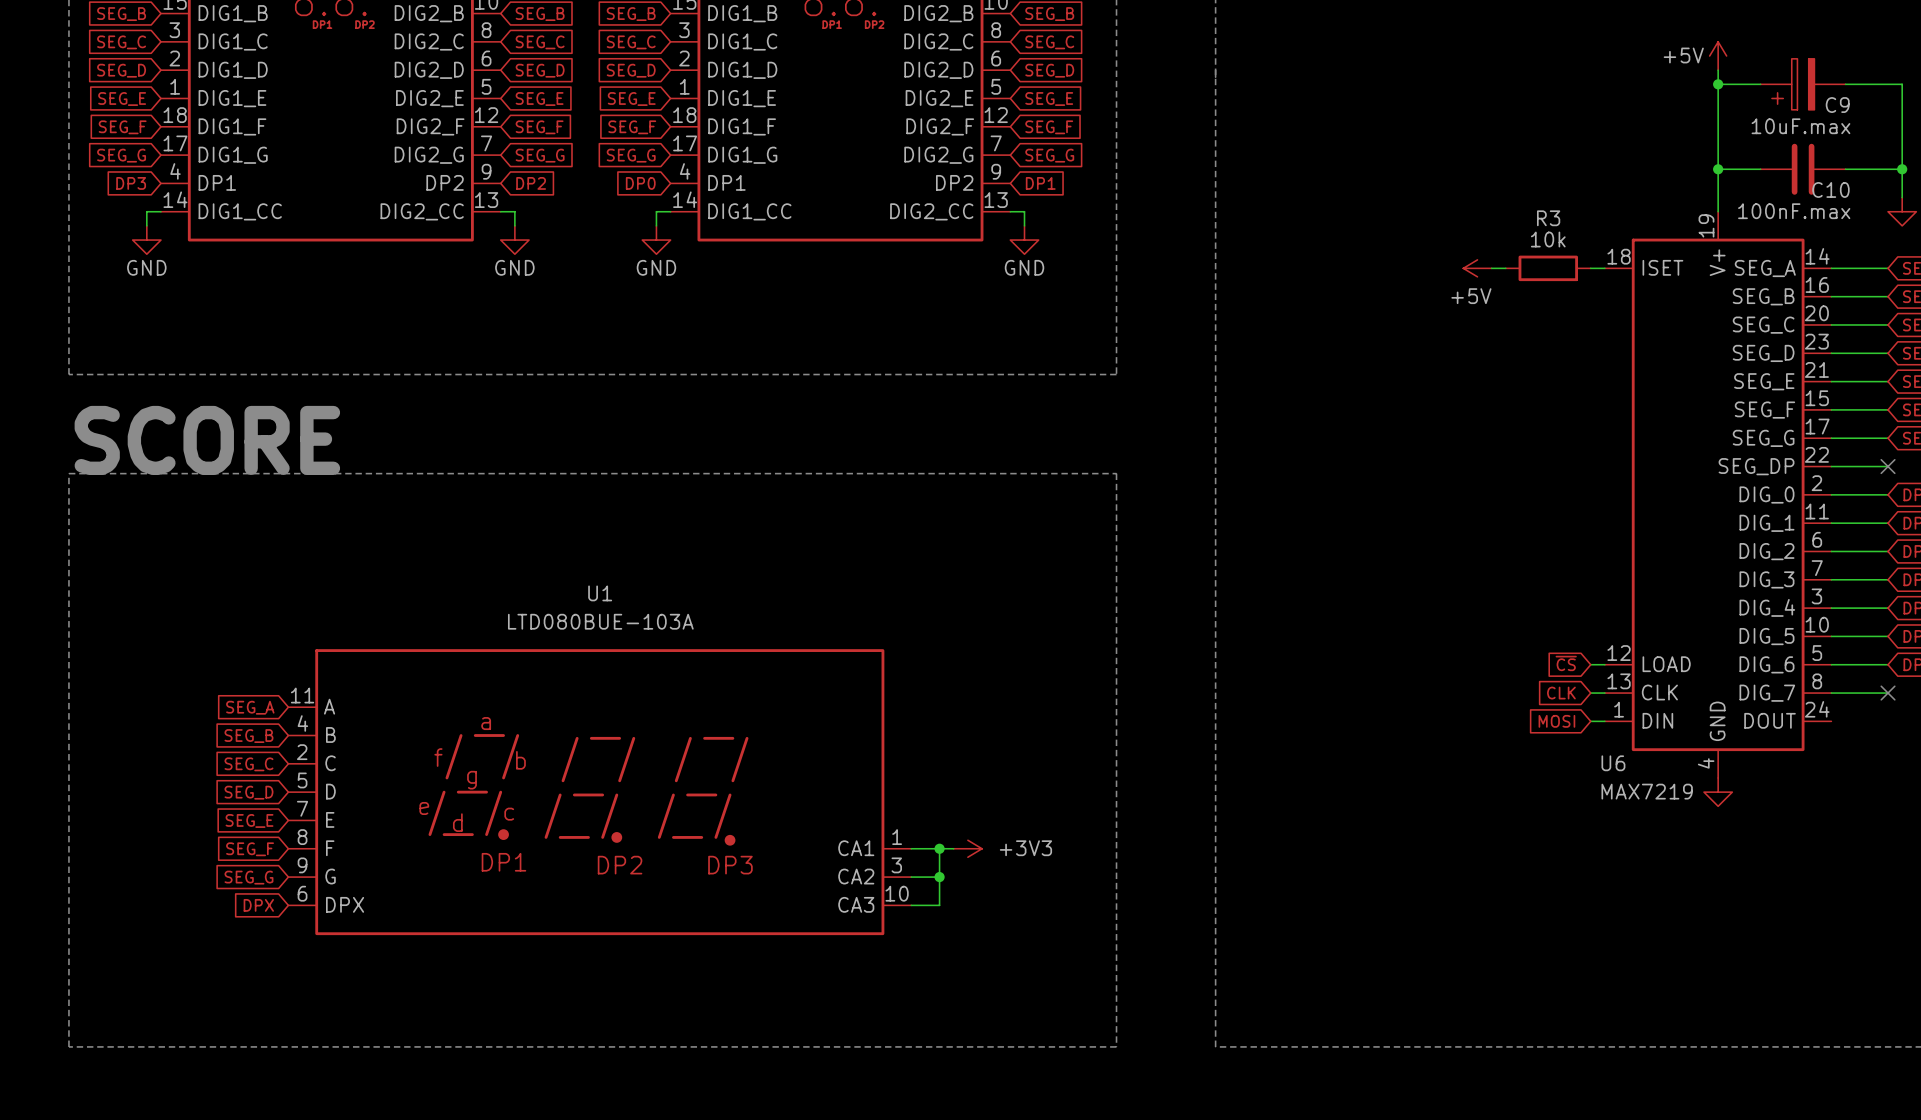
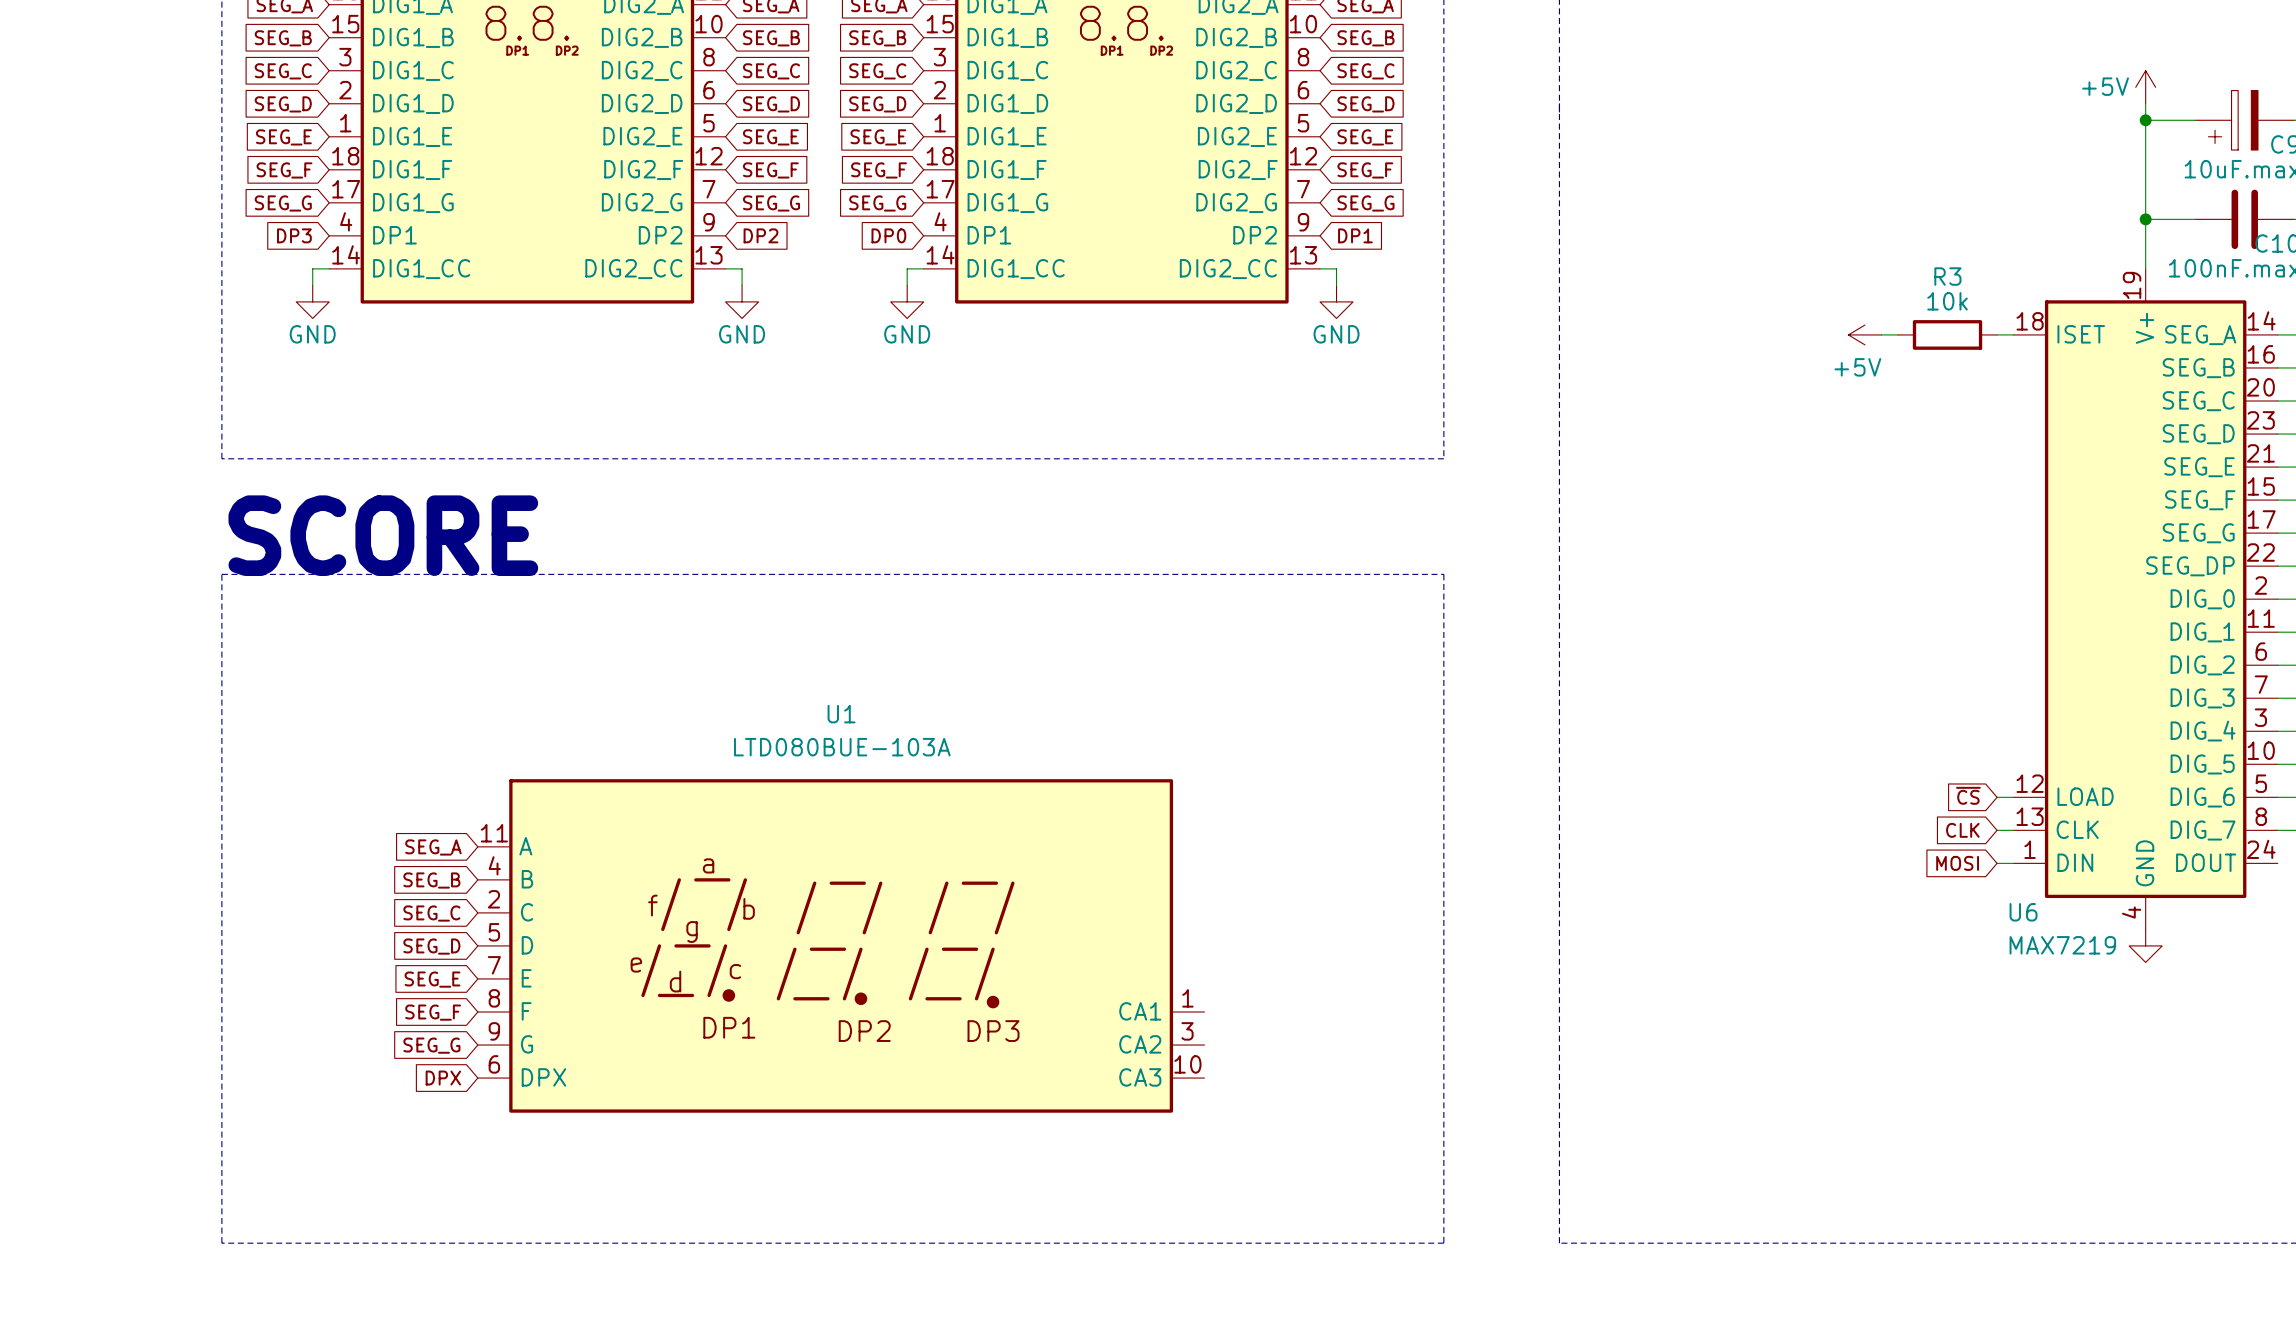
wire: (911, 848) (953, 848) -> none
wire: (939, 848) (939, 905) (911, 905) -> none
junction: (939, 848) -> none
power symbol: +3V3 (967, 848) -> none
wire: (911, 877) (939, 877) -> none
junction: (939, 877) -> none

